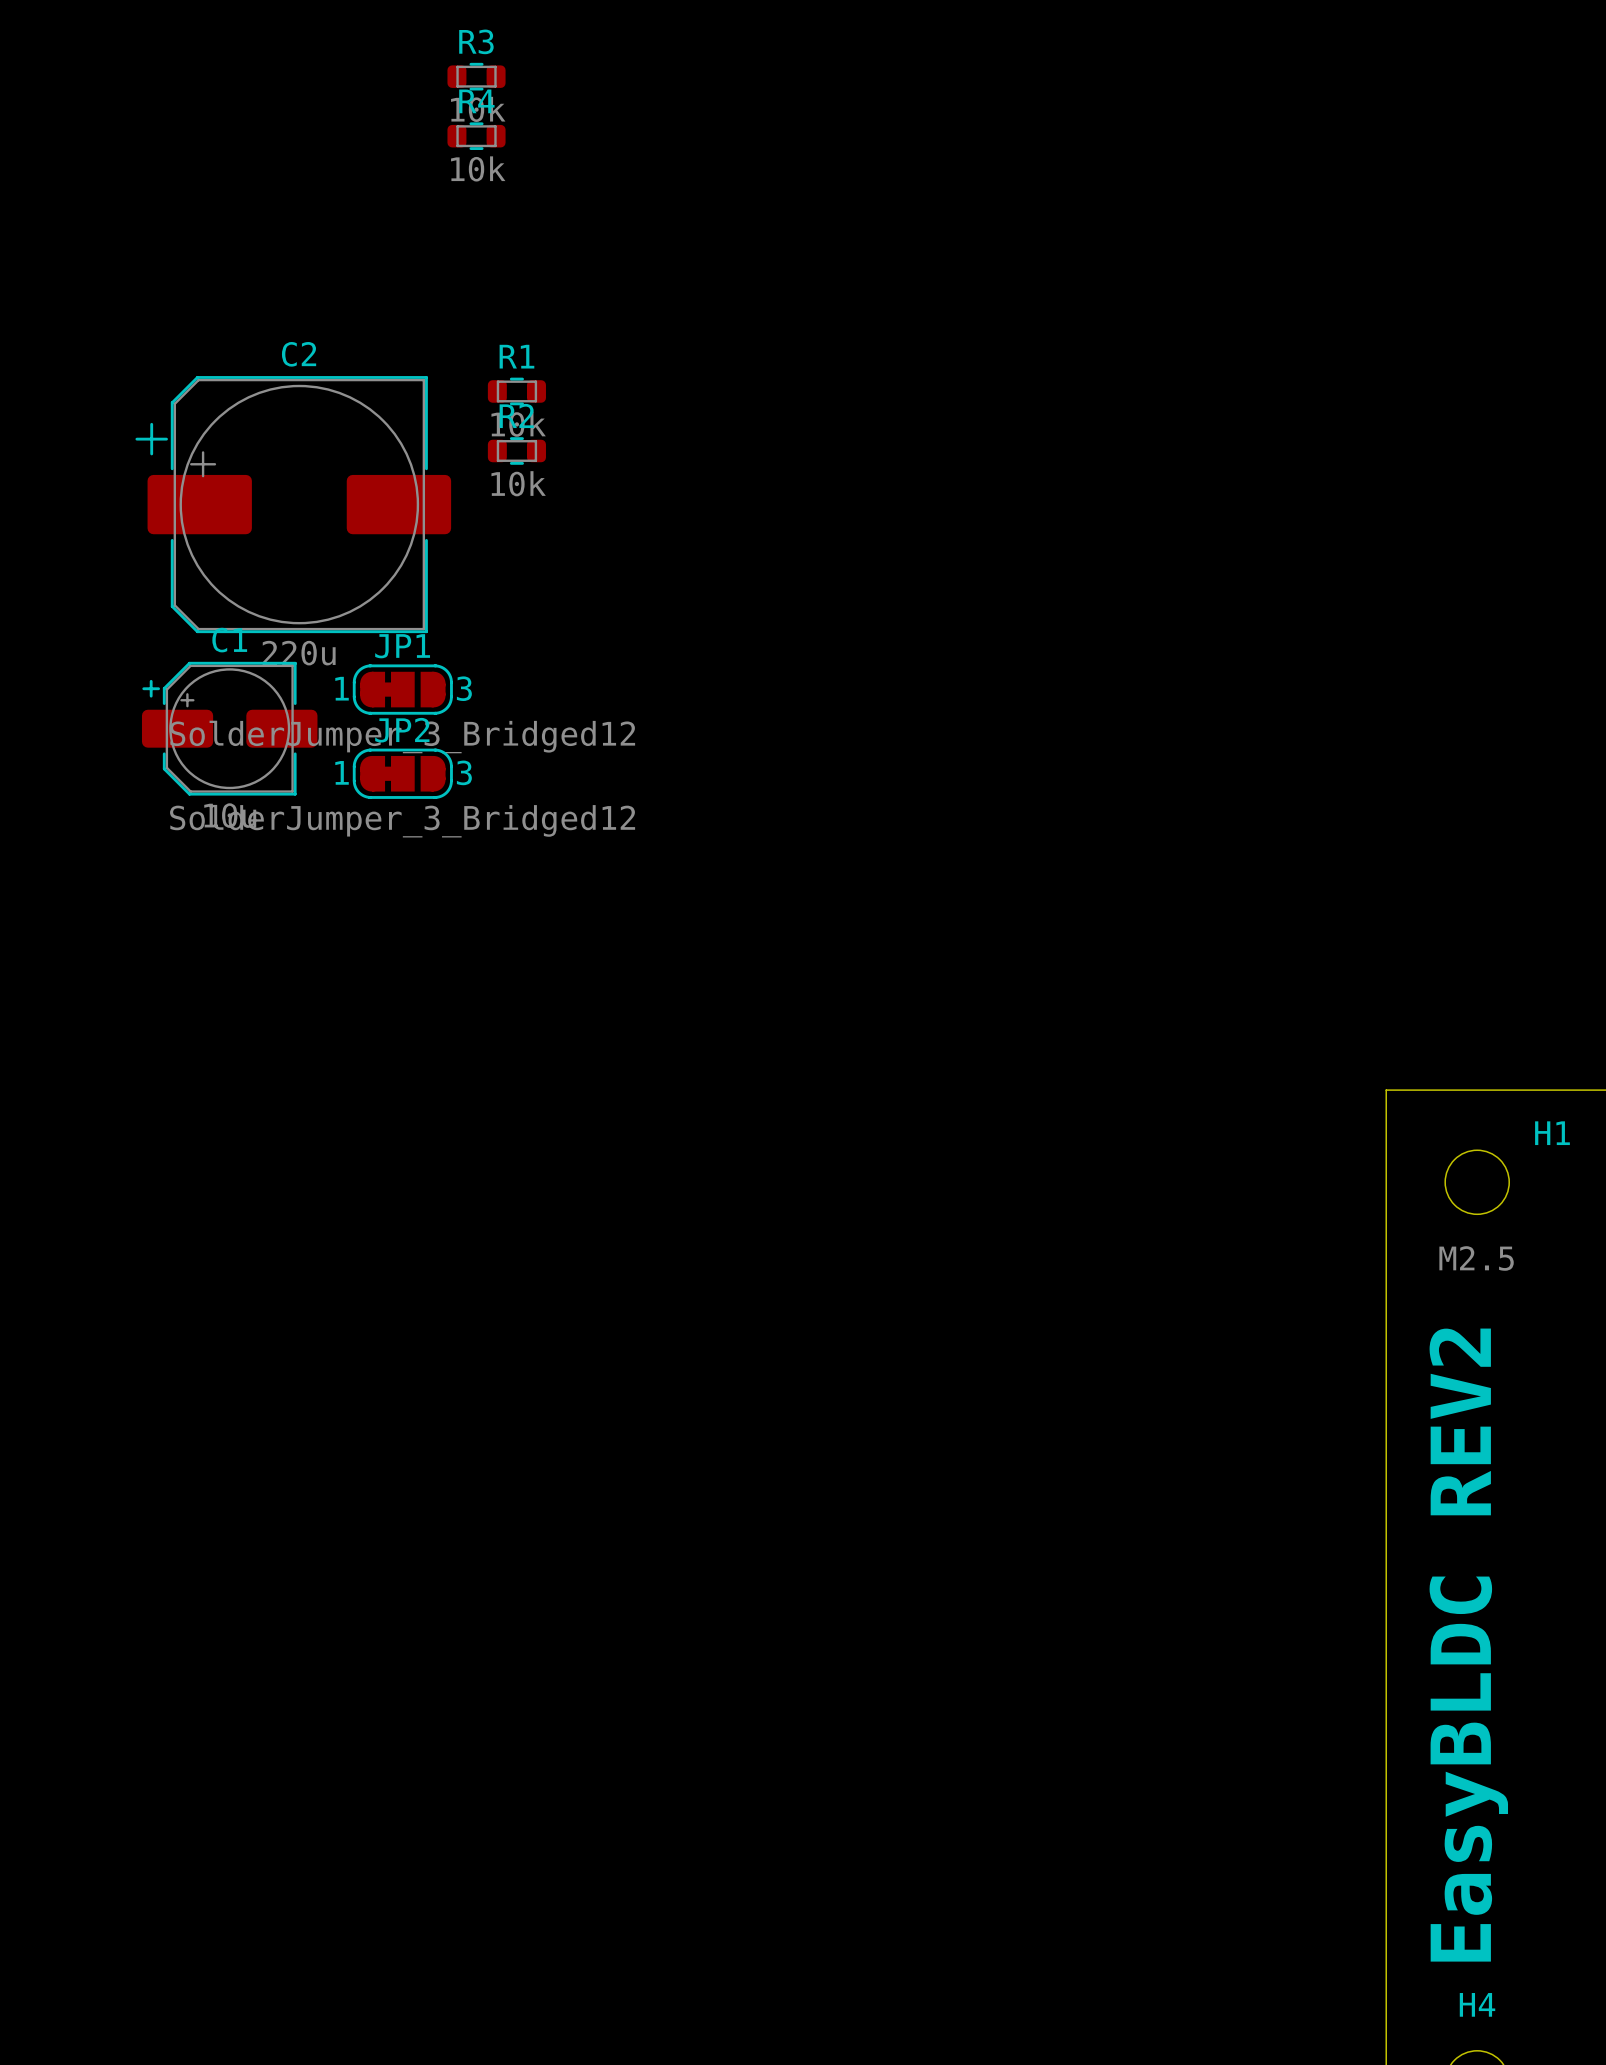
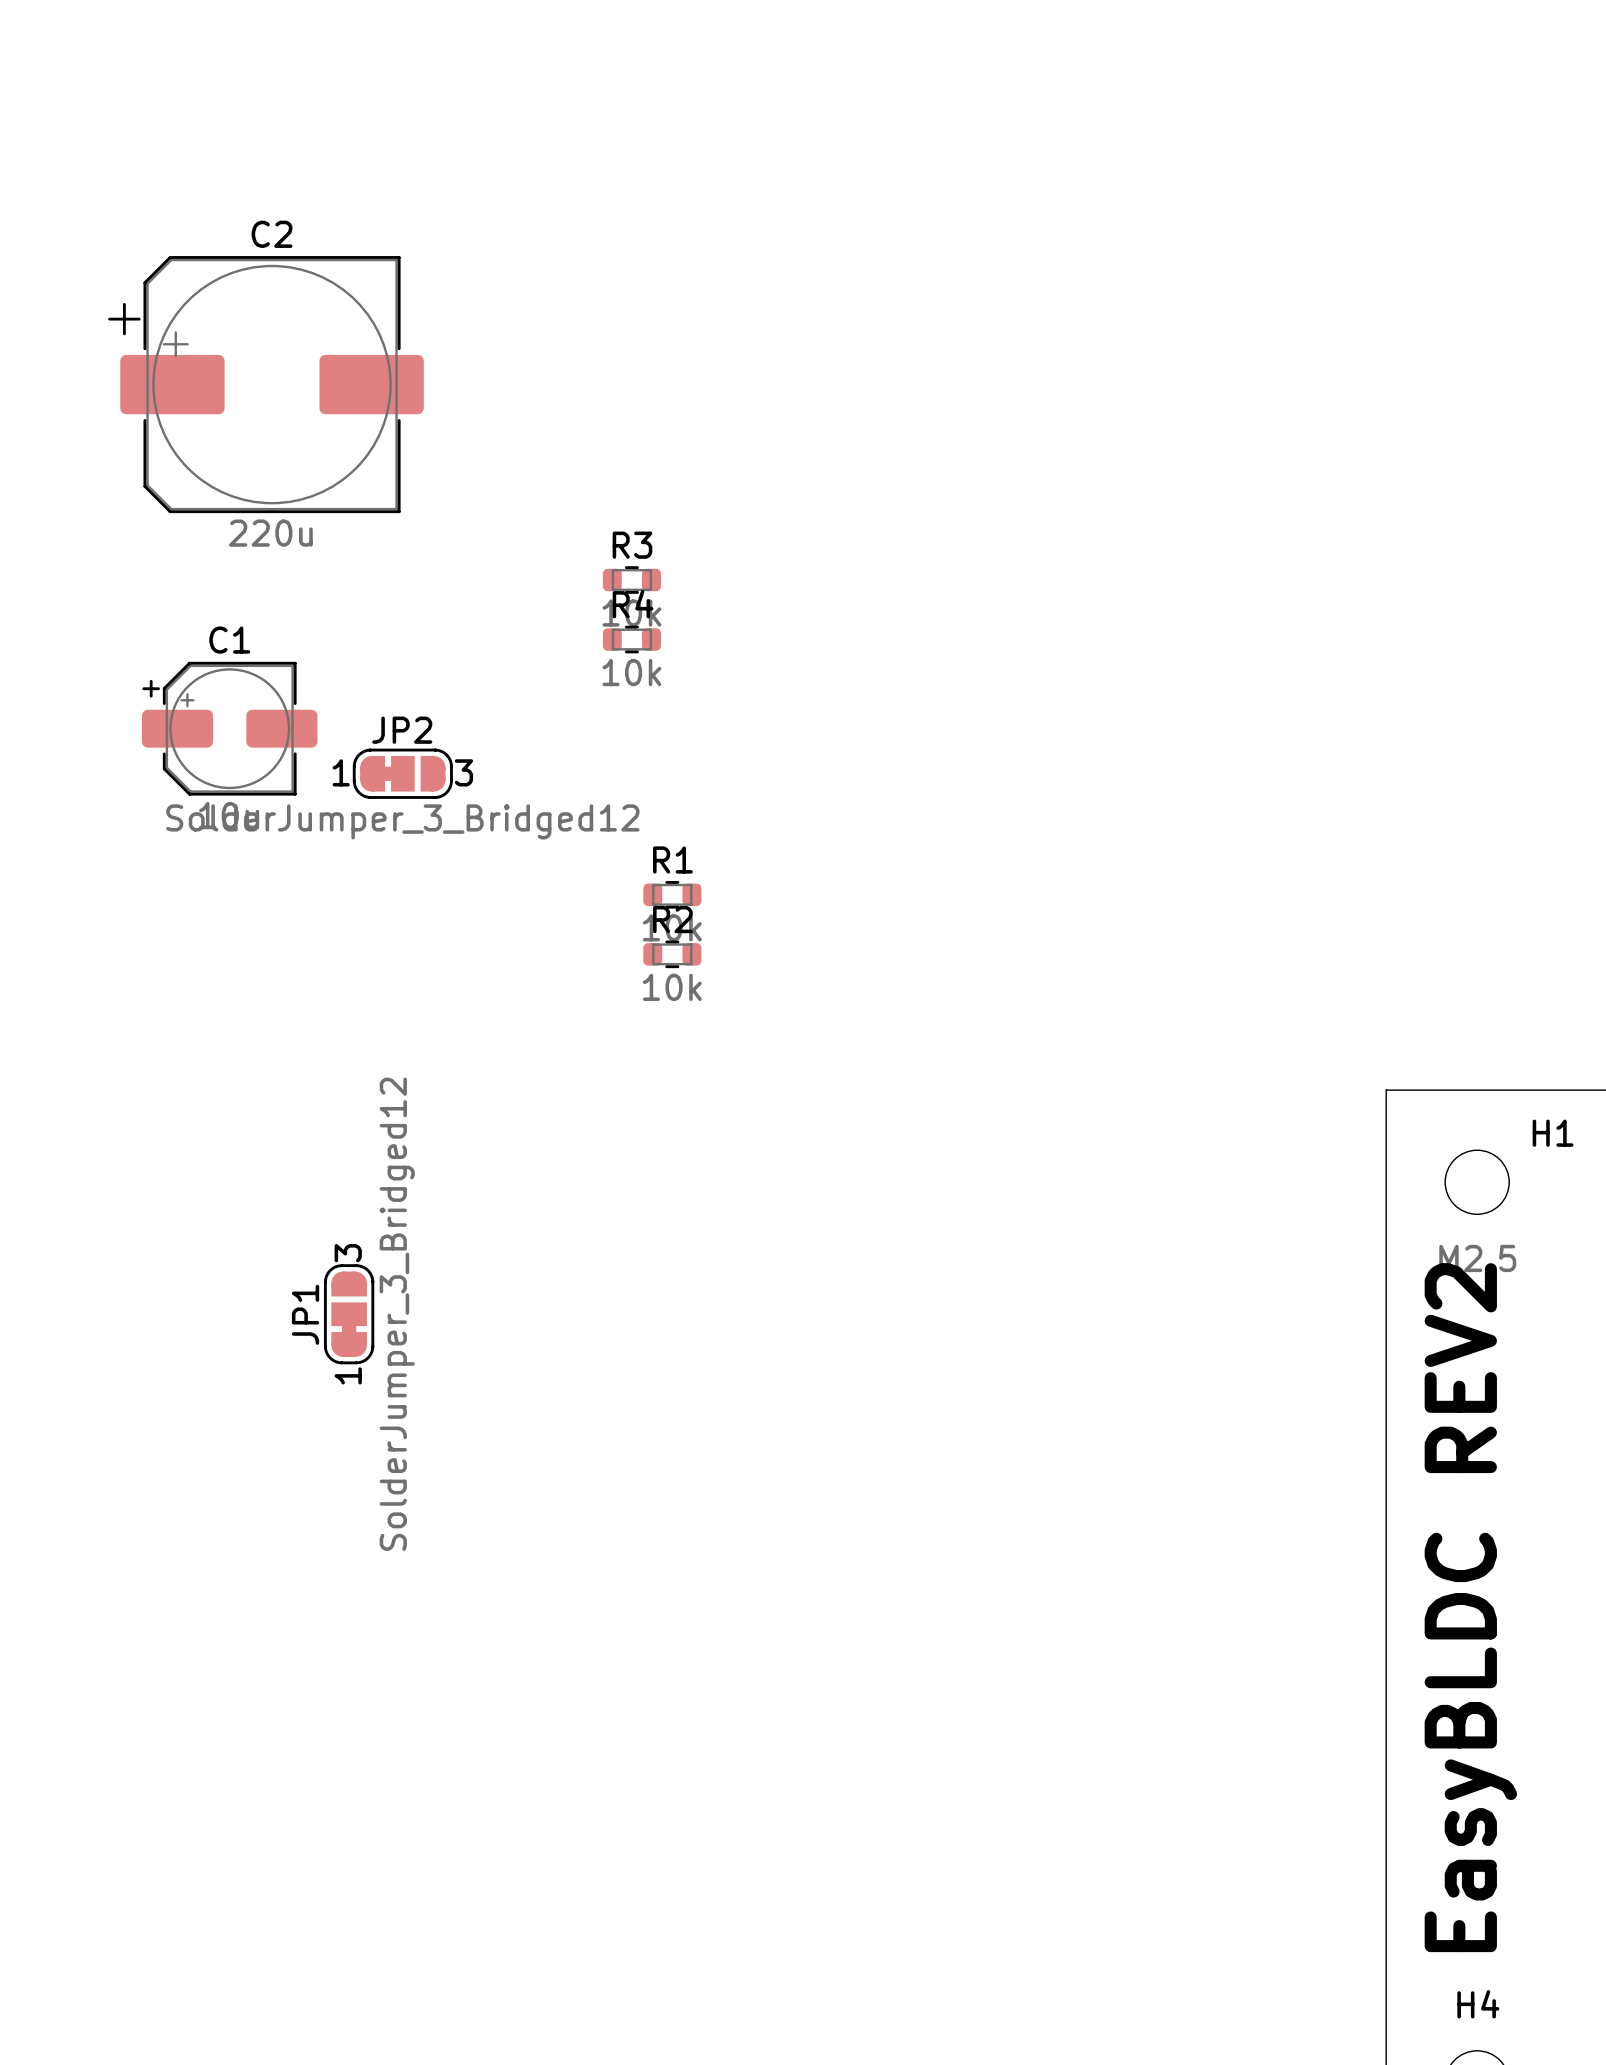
R3 position: (476, 76) -> (631, 580)
R4 position: (476, 136) -> (631, 639)
R1 position: (516, 391) -> (672, 894)
R2 position: (516, 450) -> (672, 954)
C2 position: (293, 504) -> (265, 384)
JP1 rotation: 0° (402, 689) -> 90° counterclockwise (349, 1314)
JP1 position: (402, 689) -> (349, 1314)

